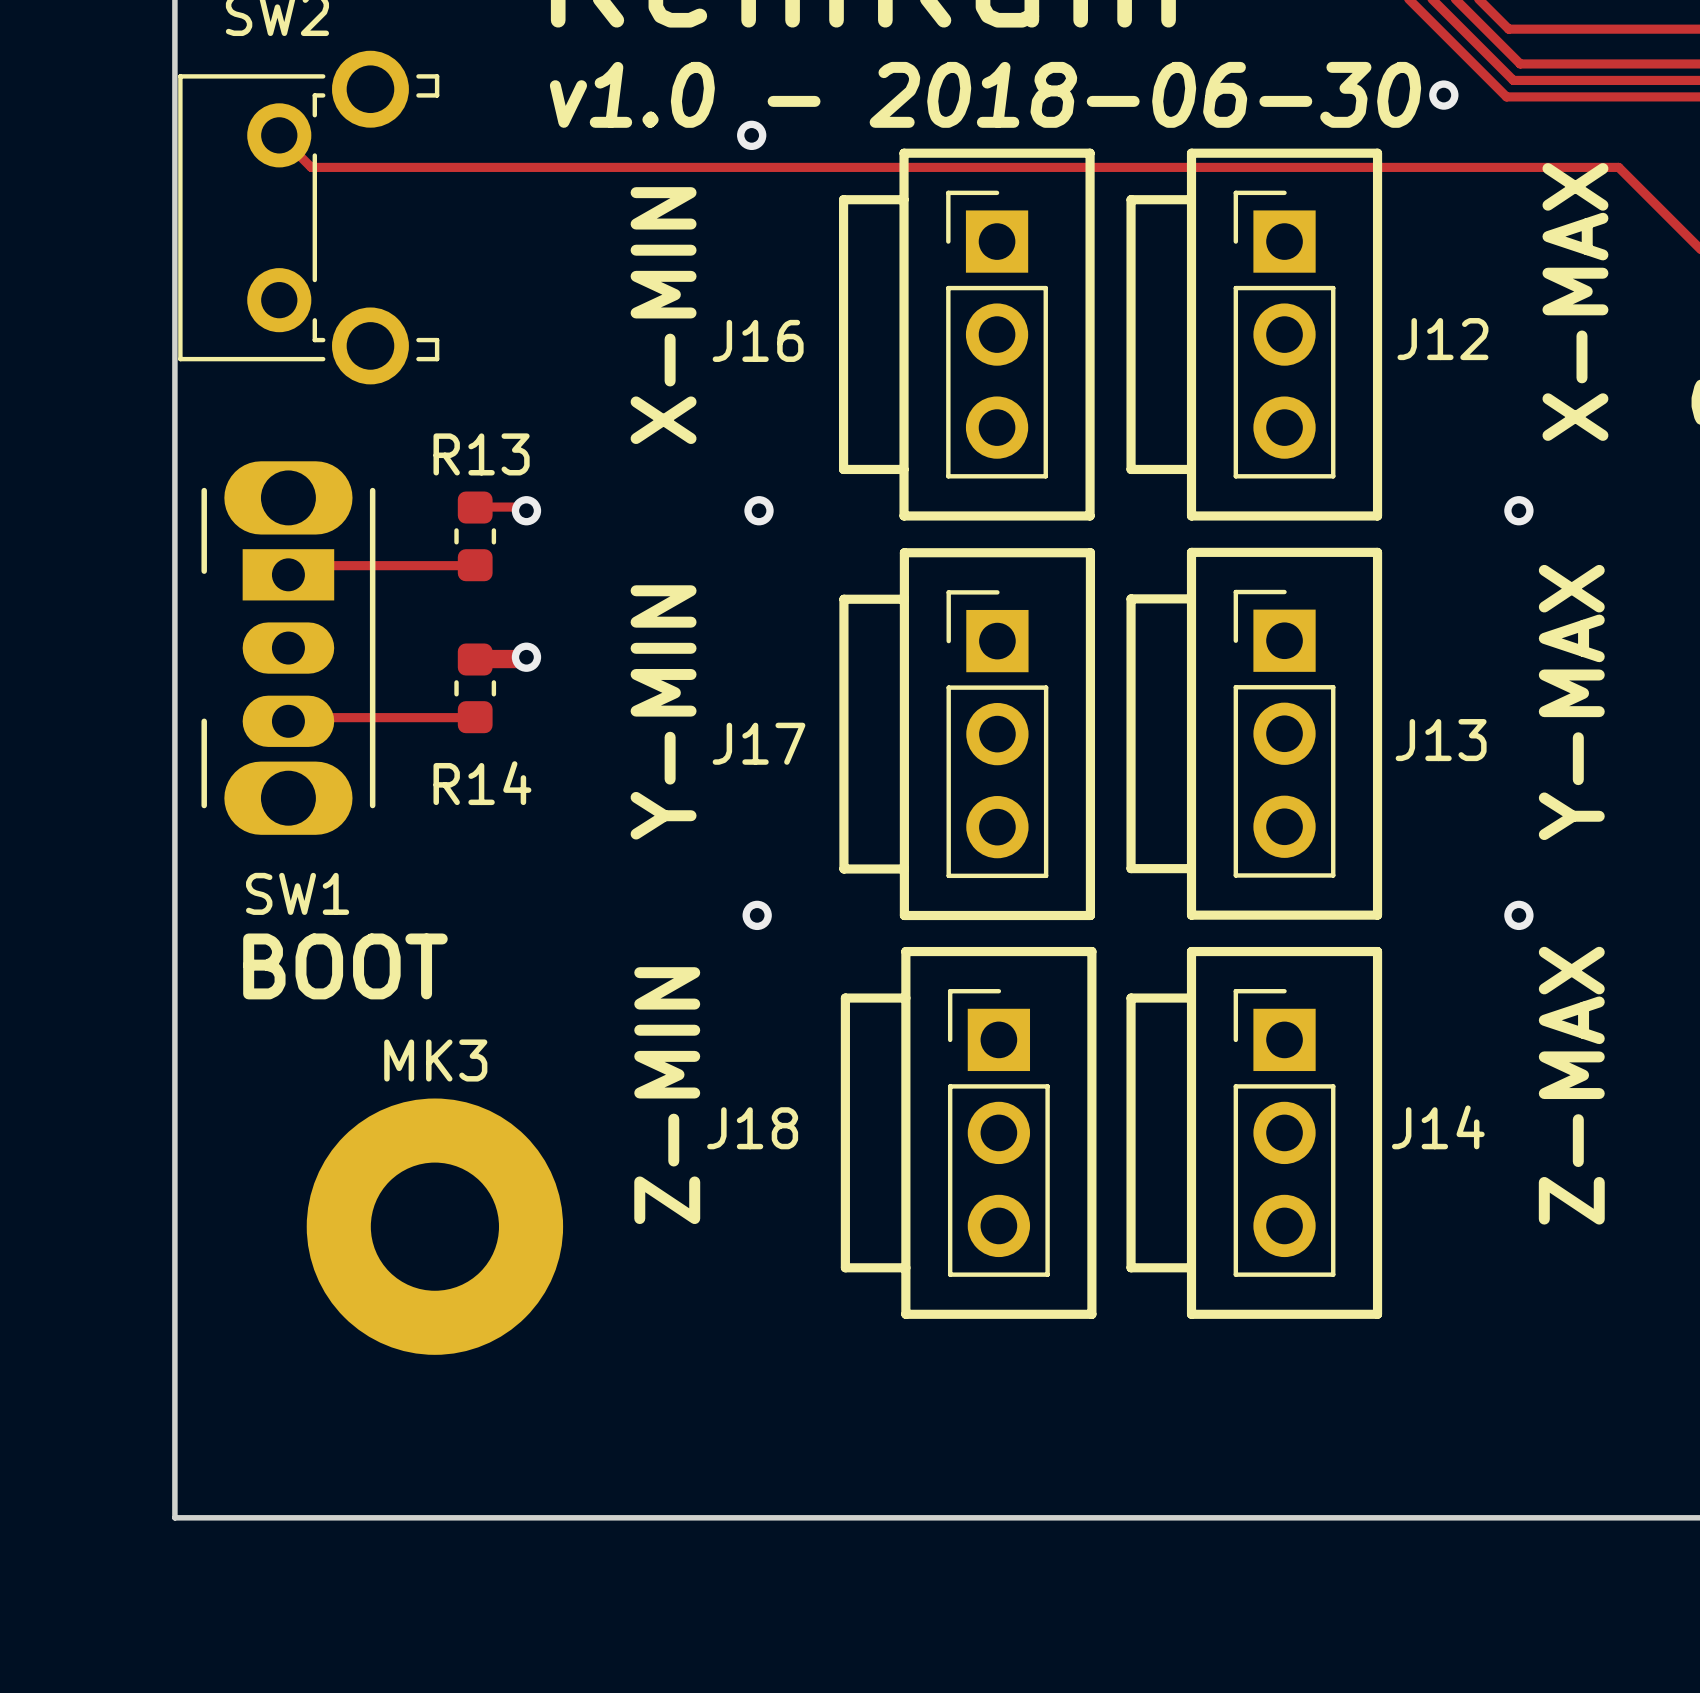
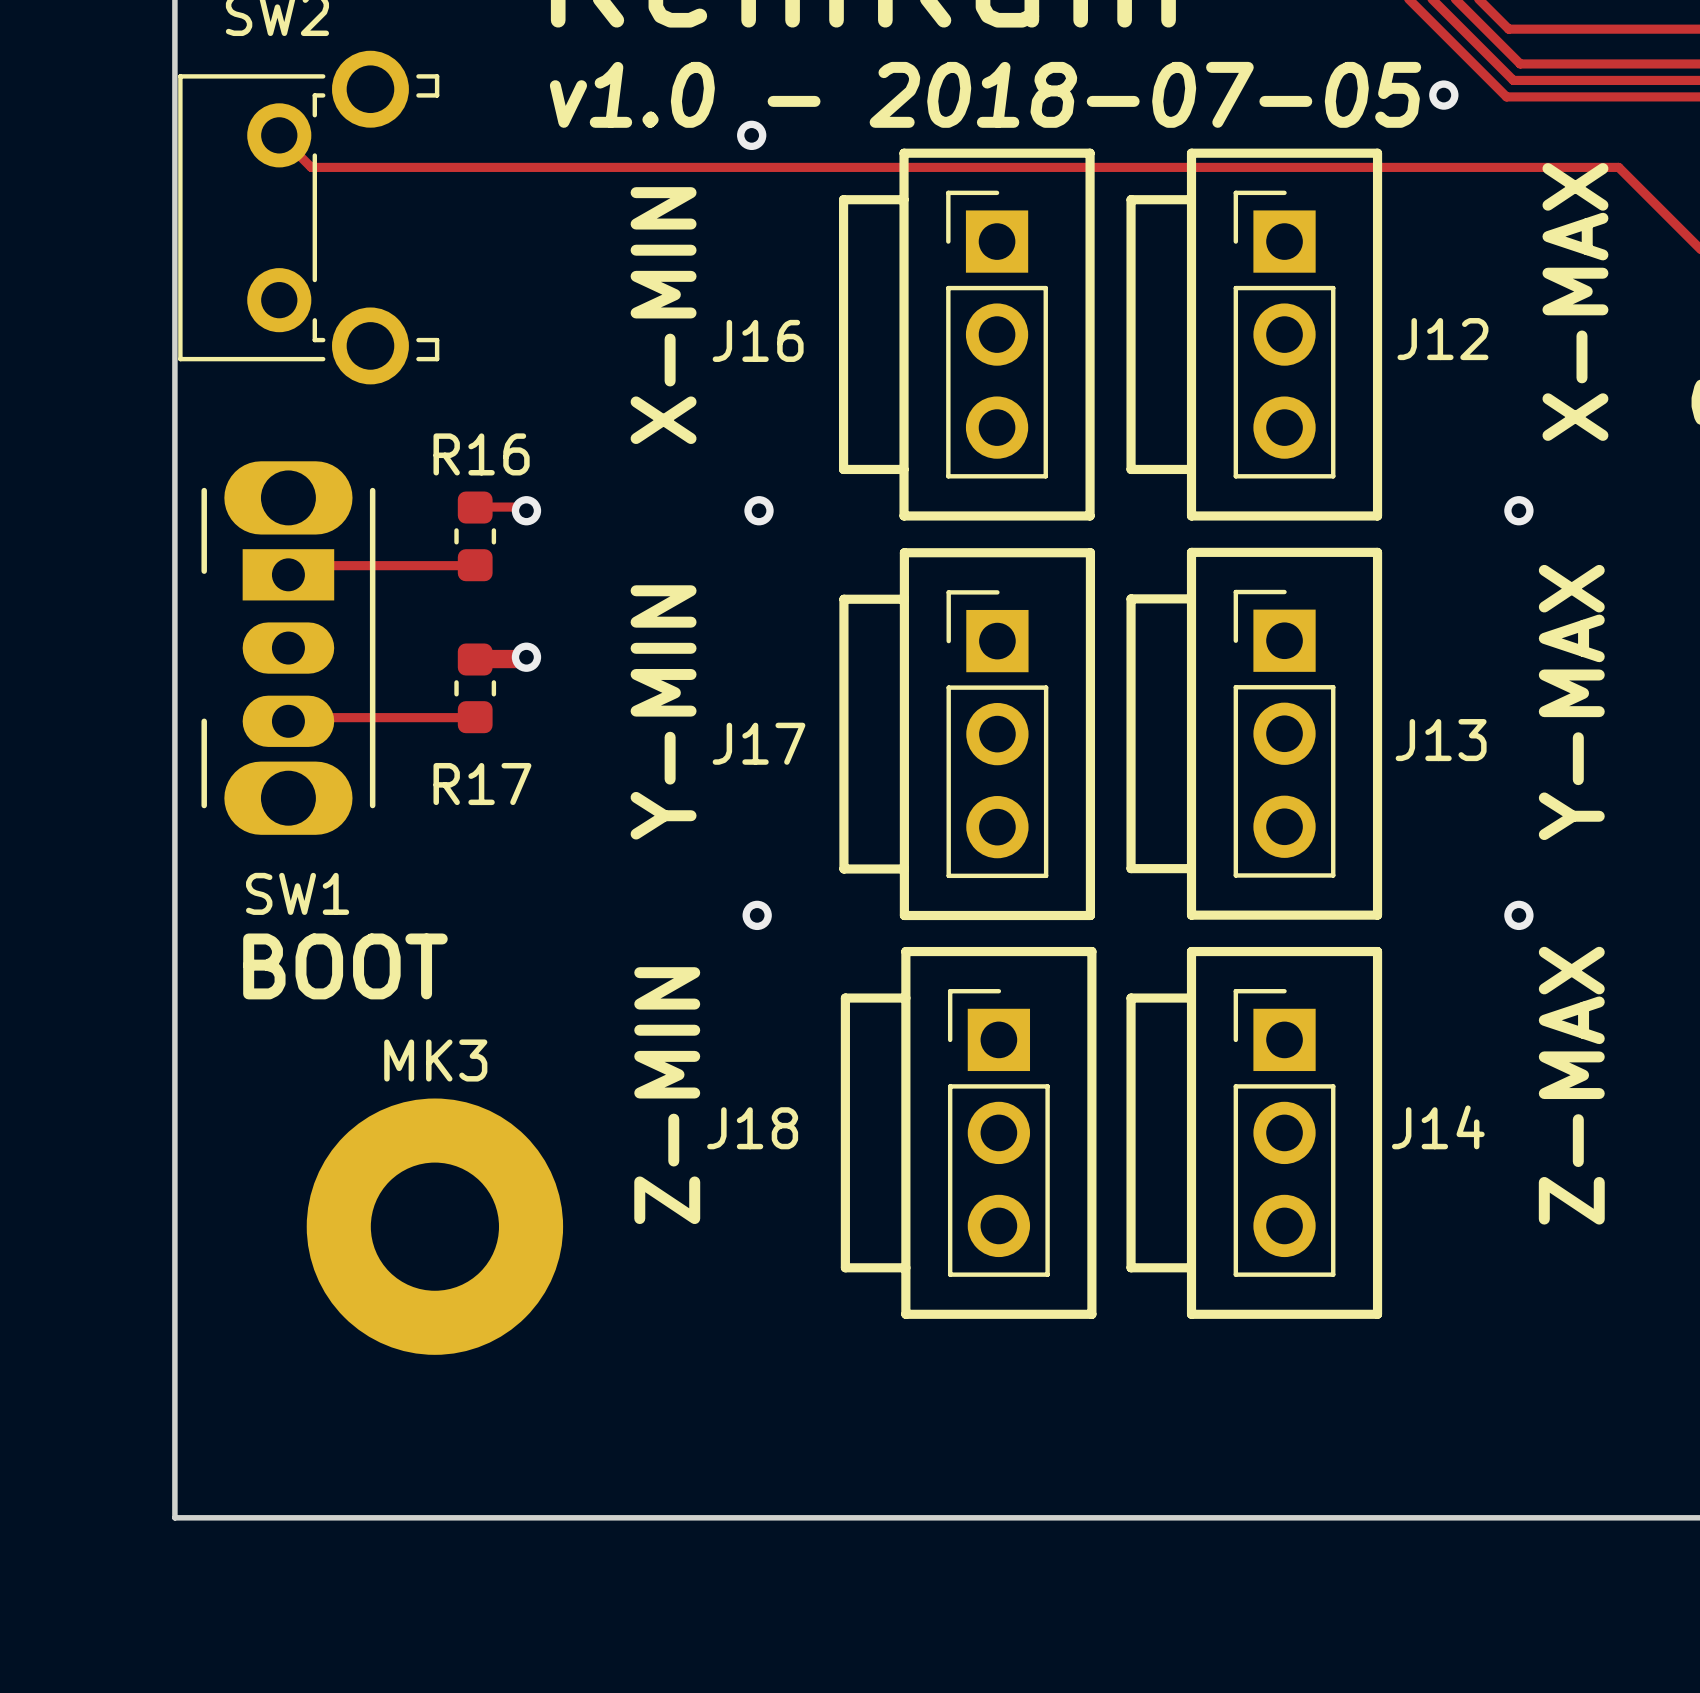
text: v1.0 - 2018-06-30 (985, 94) -> v1.0 - 2018-07-05 (985, 94)
R13 name: R13 (481, 454) -> R16 (481, 454)
R14 name: R14 (482, 783) -> R17 (482, 784)

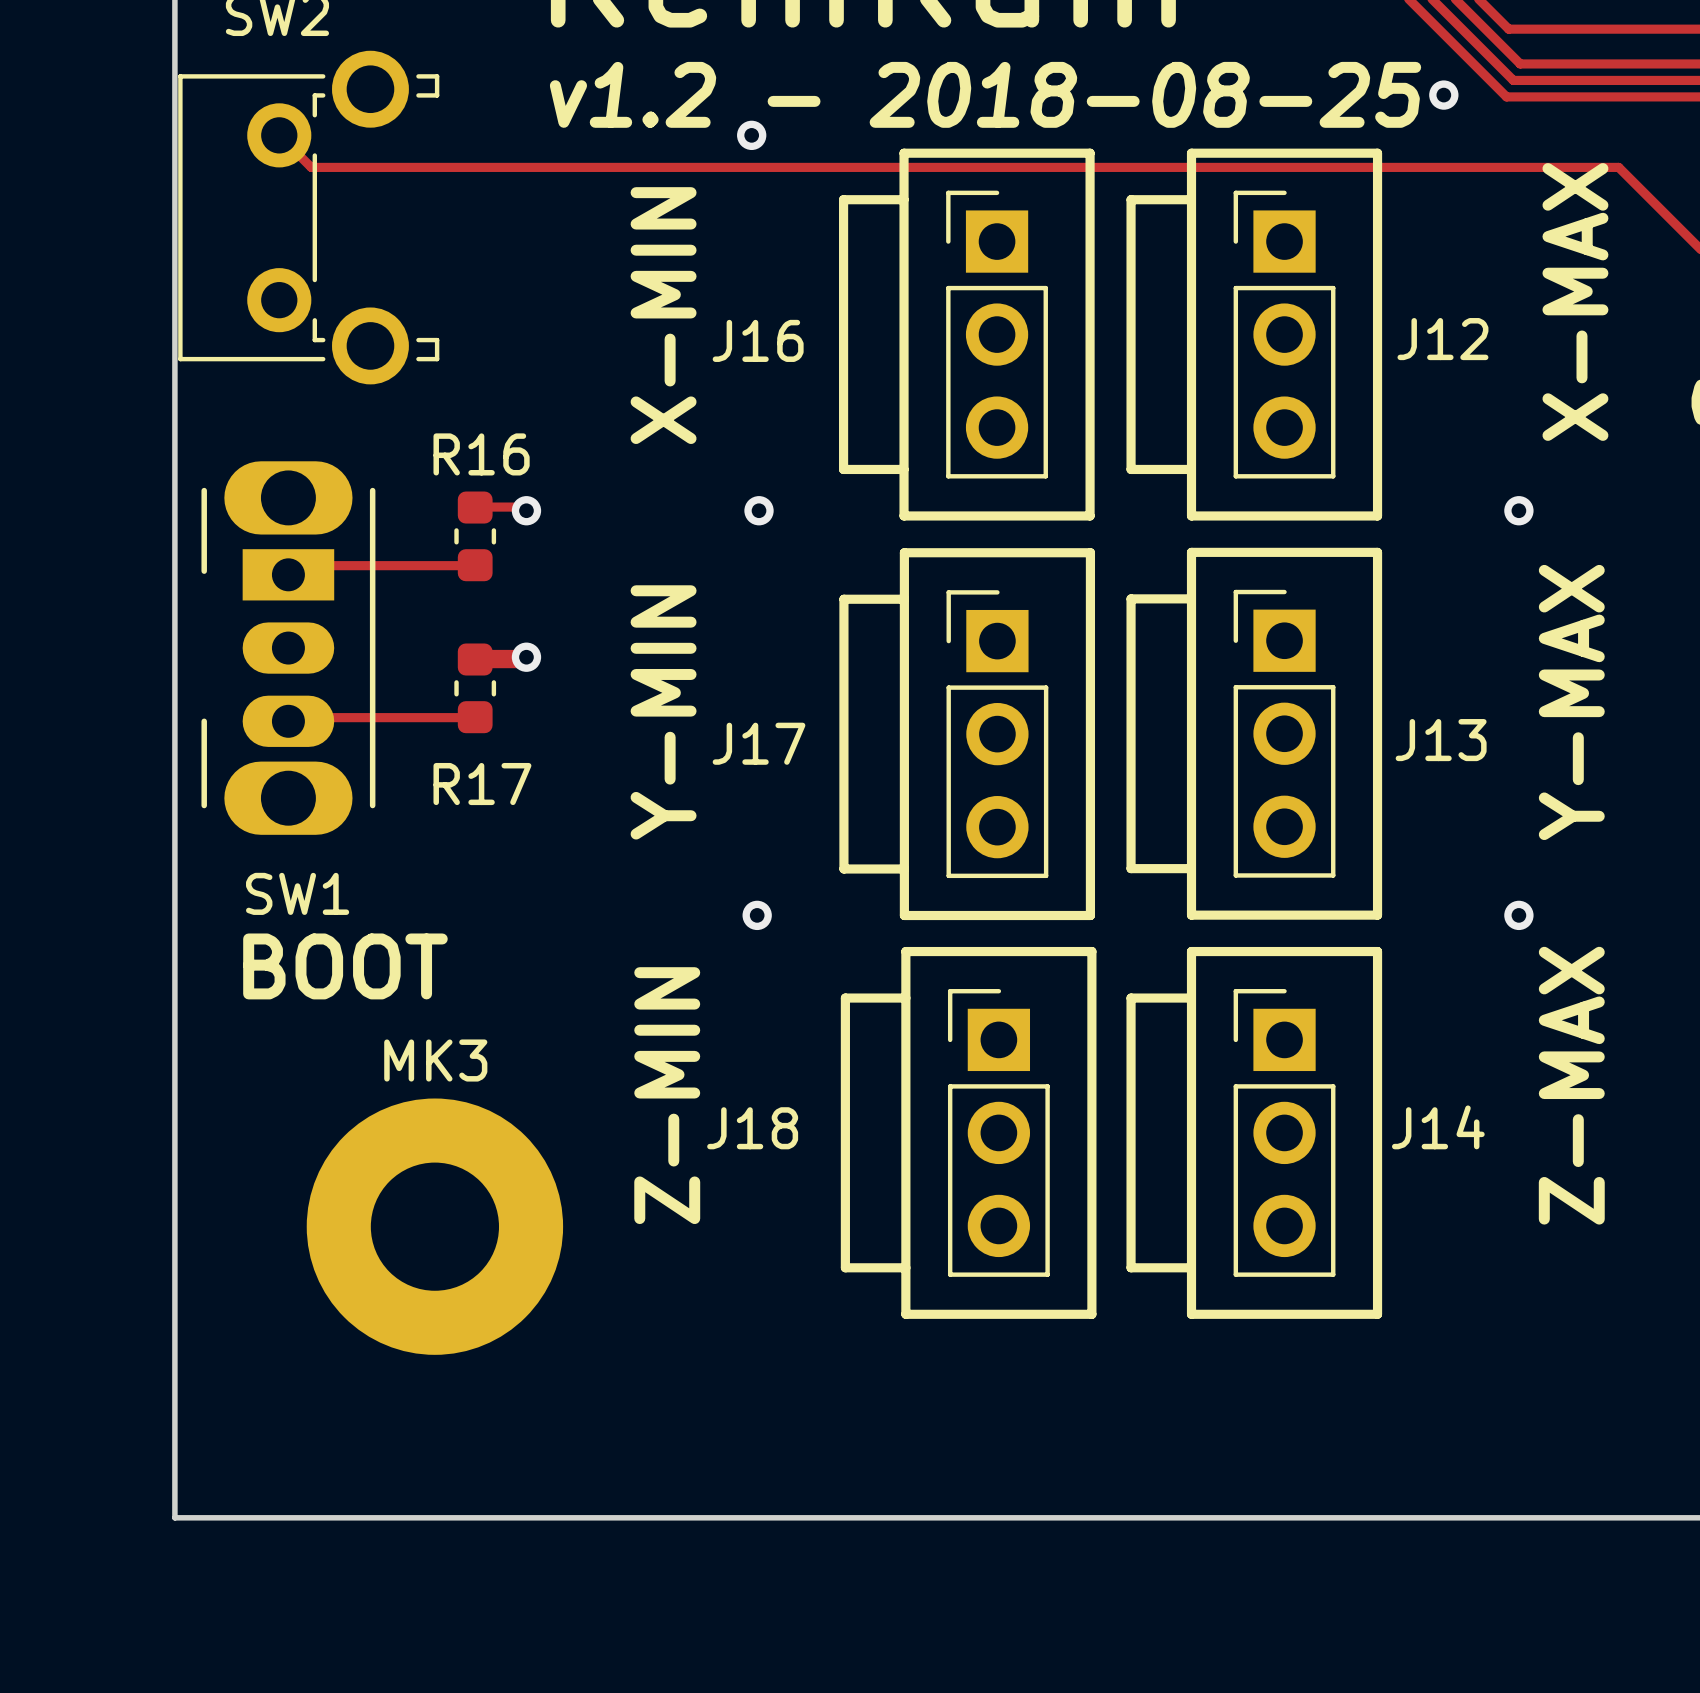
text: v1.0 - 2018-07-05 (985, 94) -> v1.2 - 2018-08-25 (985, 94)

